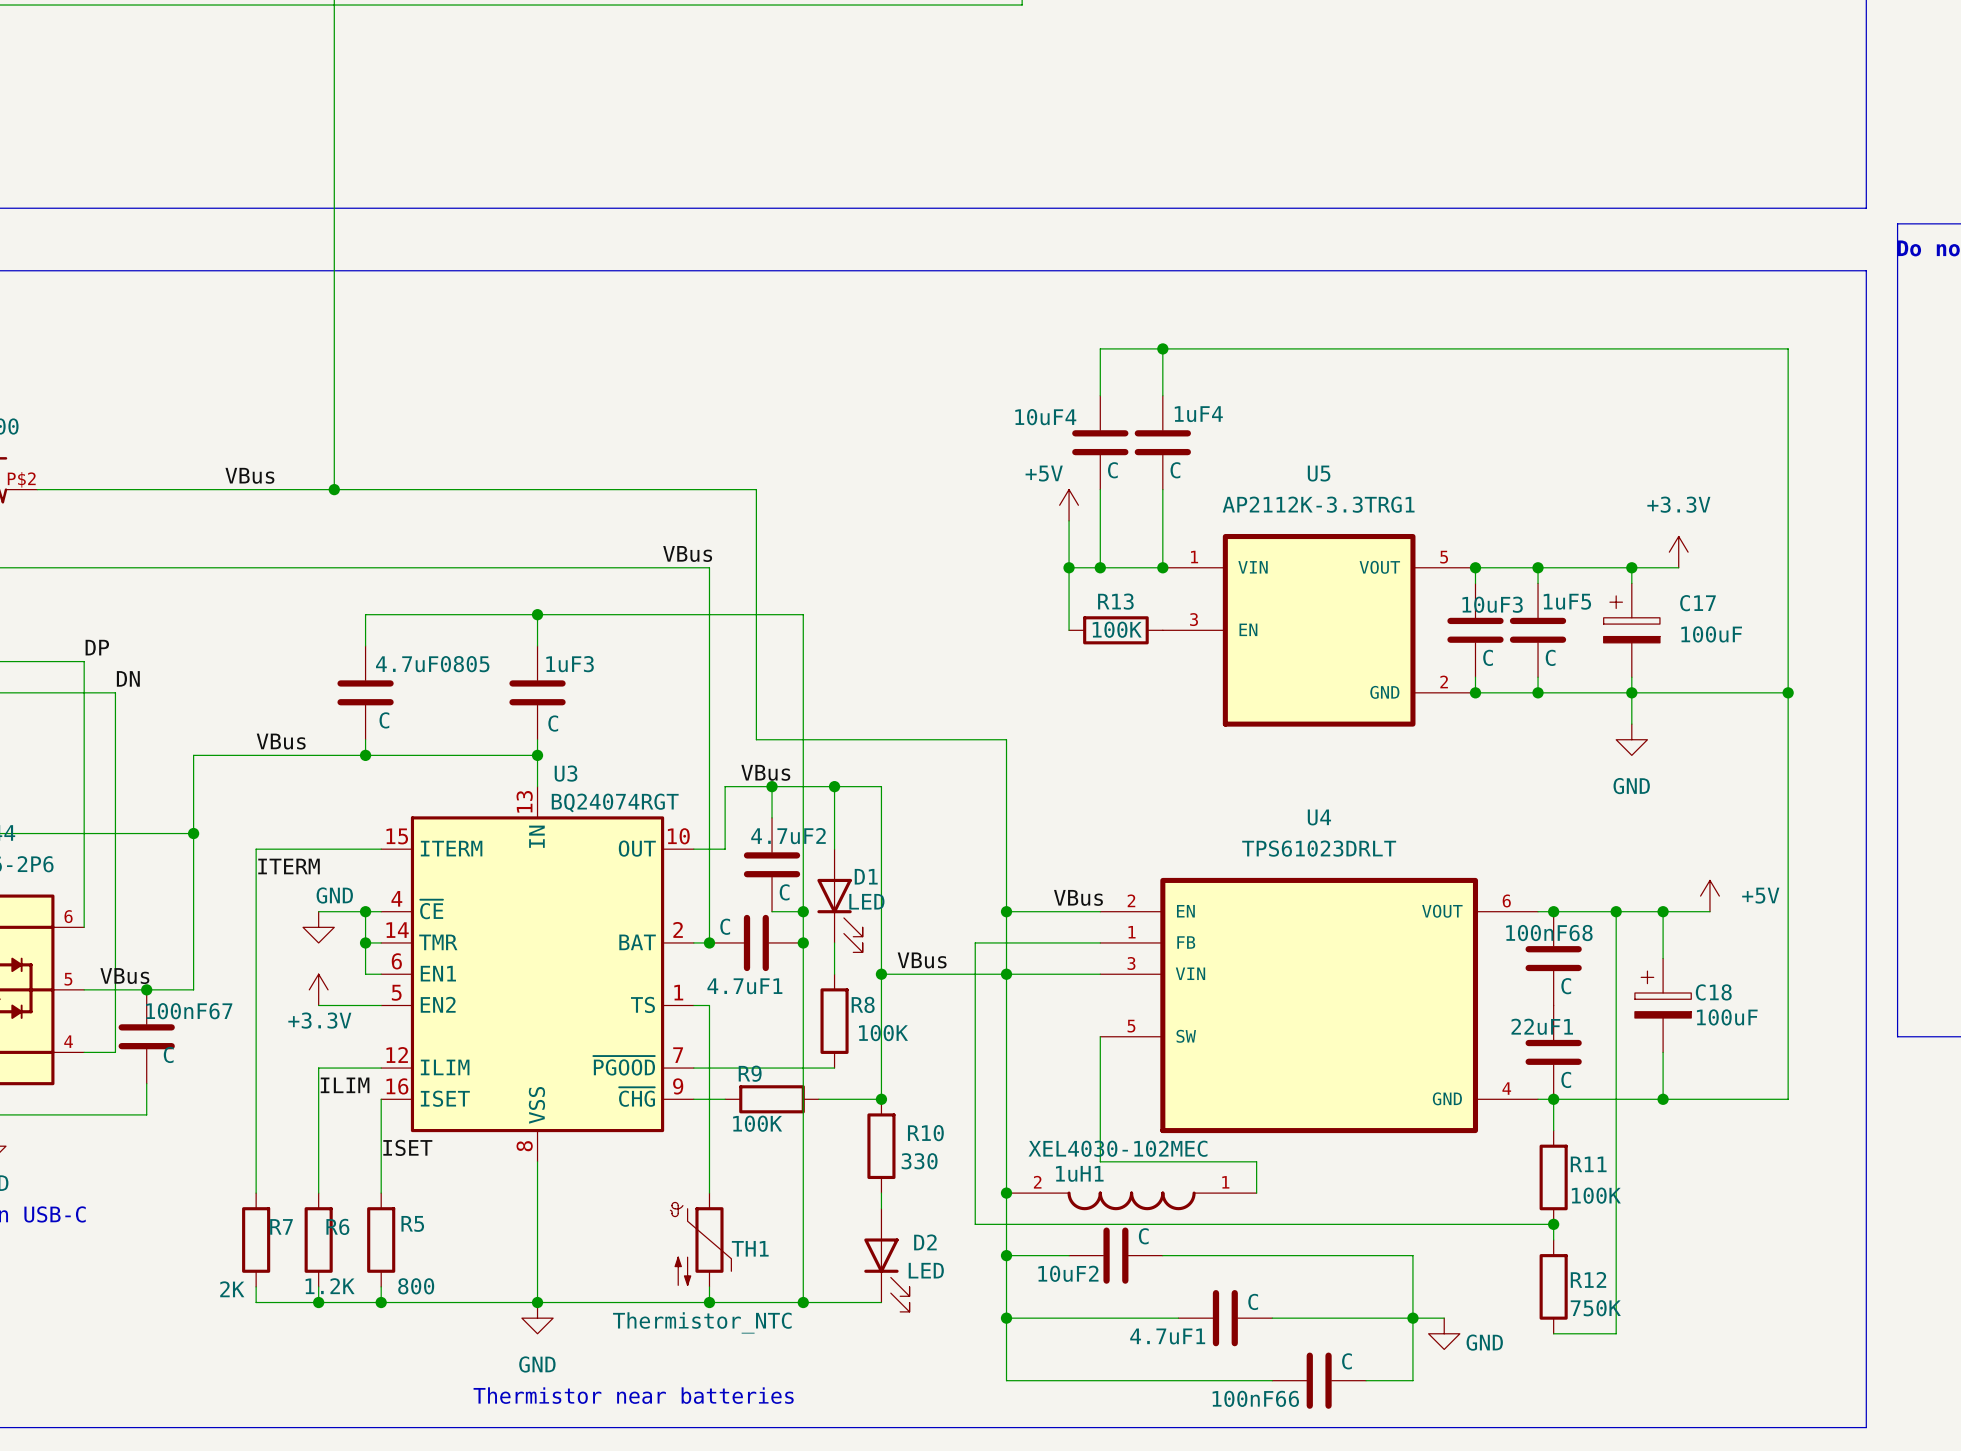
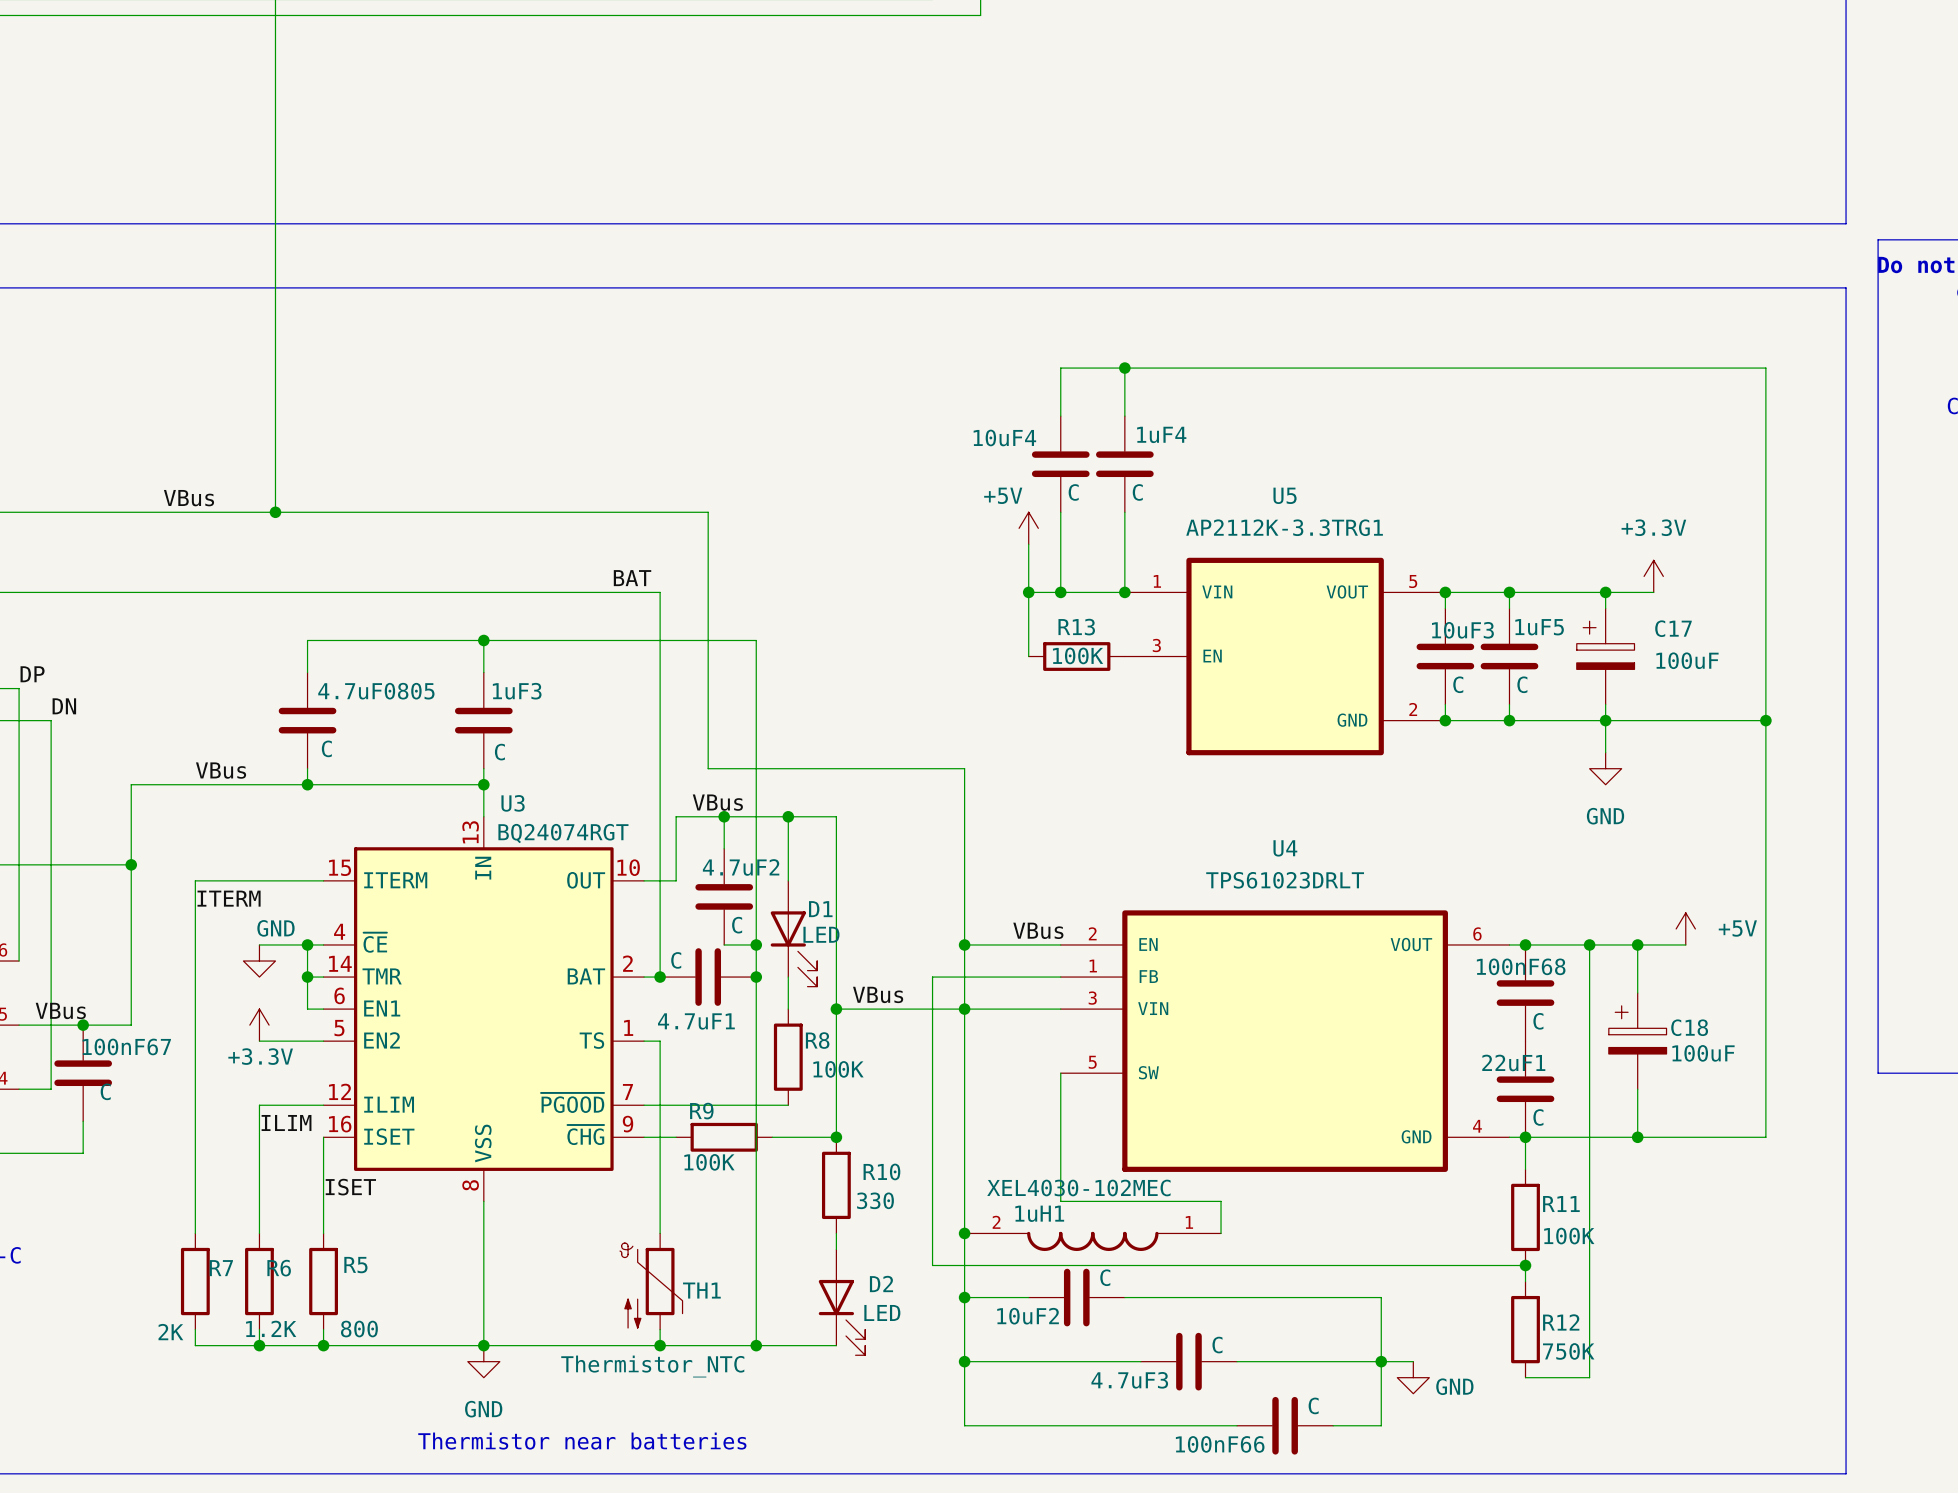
label: VBus (687, 553) -> BAT (632, 578)
4.7uF1 name: 4.7uF1 (1167, 1336) -> 4.7uF3 (1129, 1380)

